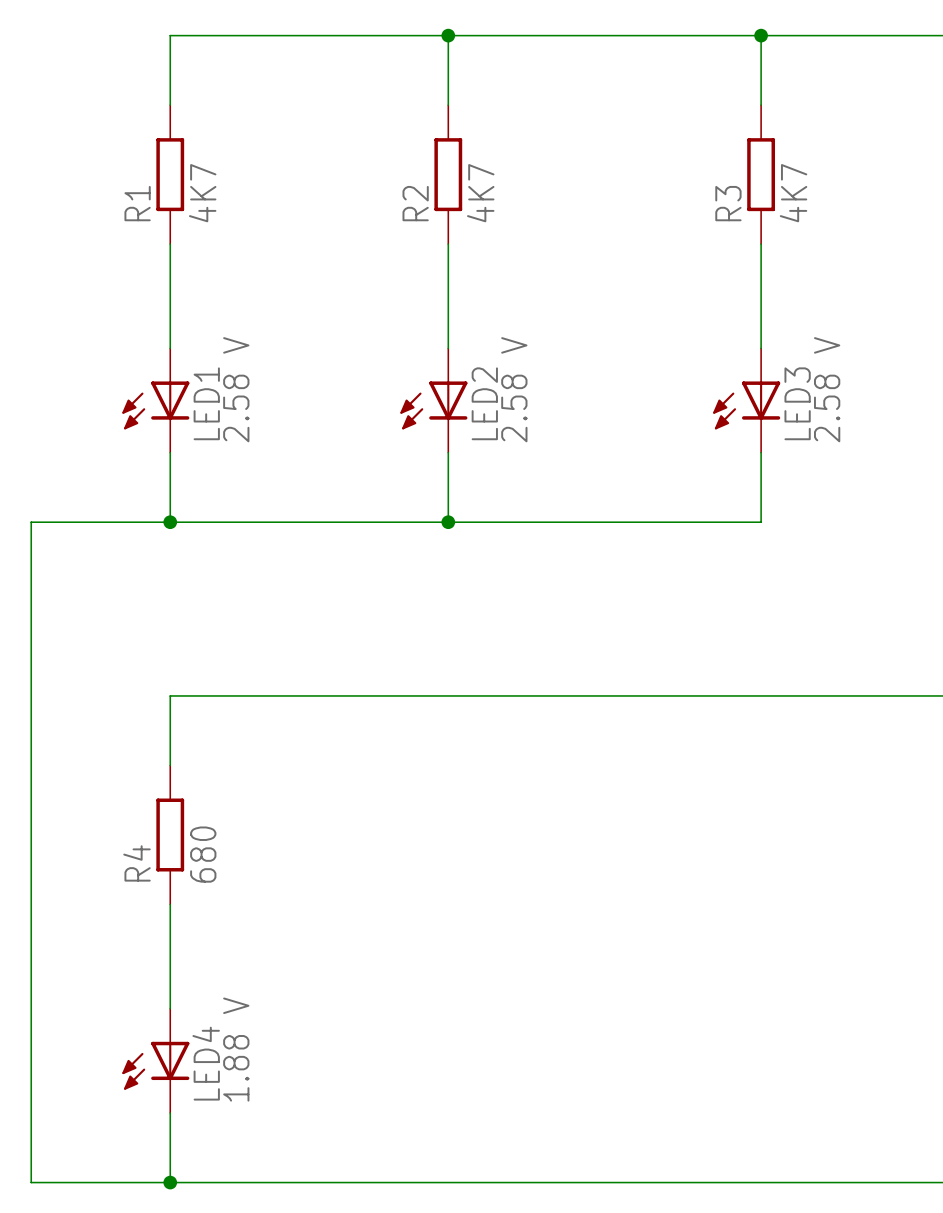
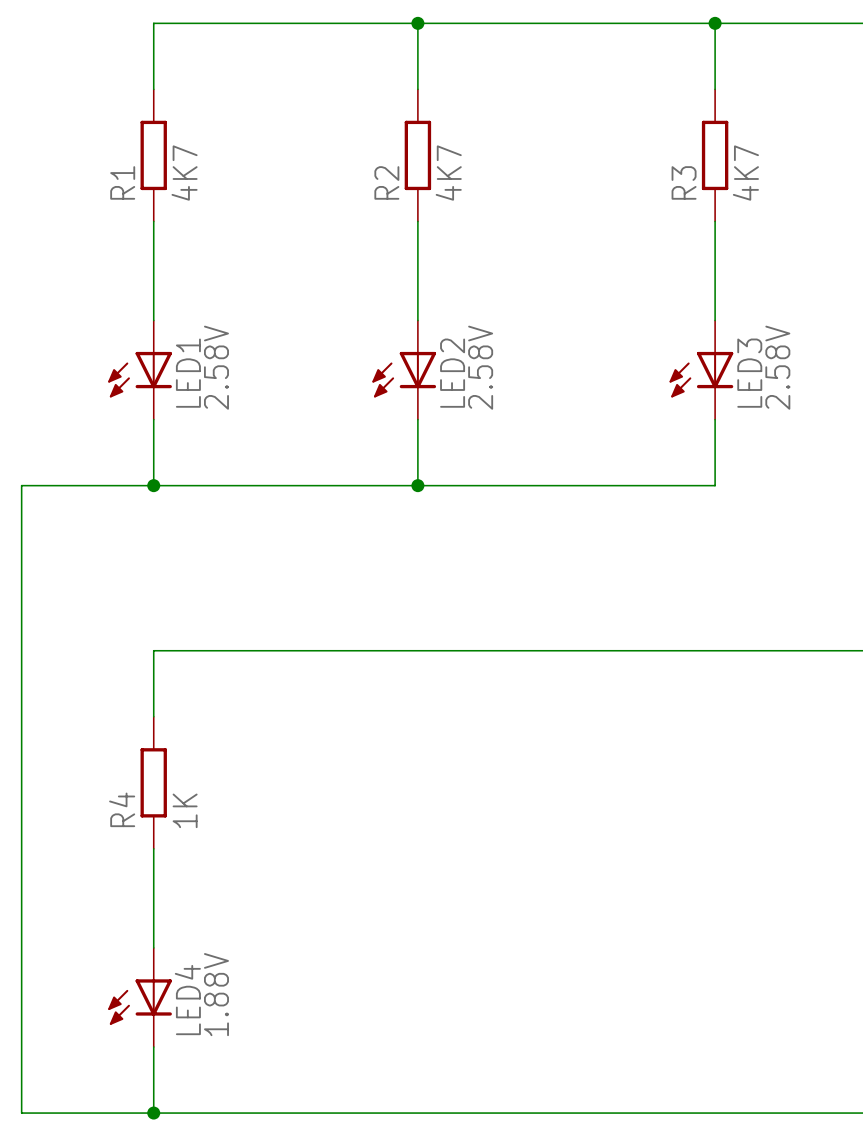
LED1 value: 2.58 V (236, 389) -> 2.58V (216, 367)
LED2 value: 2.58 V (514, 389) -> 2.58V (480, 367)
LED3 value: 2.58 V (827, 389) -> 2.58V (777, 367)
R4 value: 680 (203, 854) -> 1K (185, 810)
LED4 value: 1.88 V (236, 1049) -> 1.88V (216, 994)

